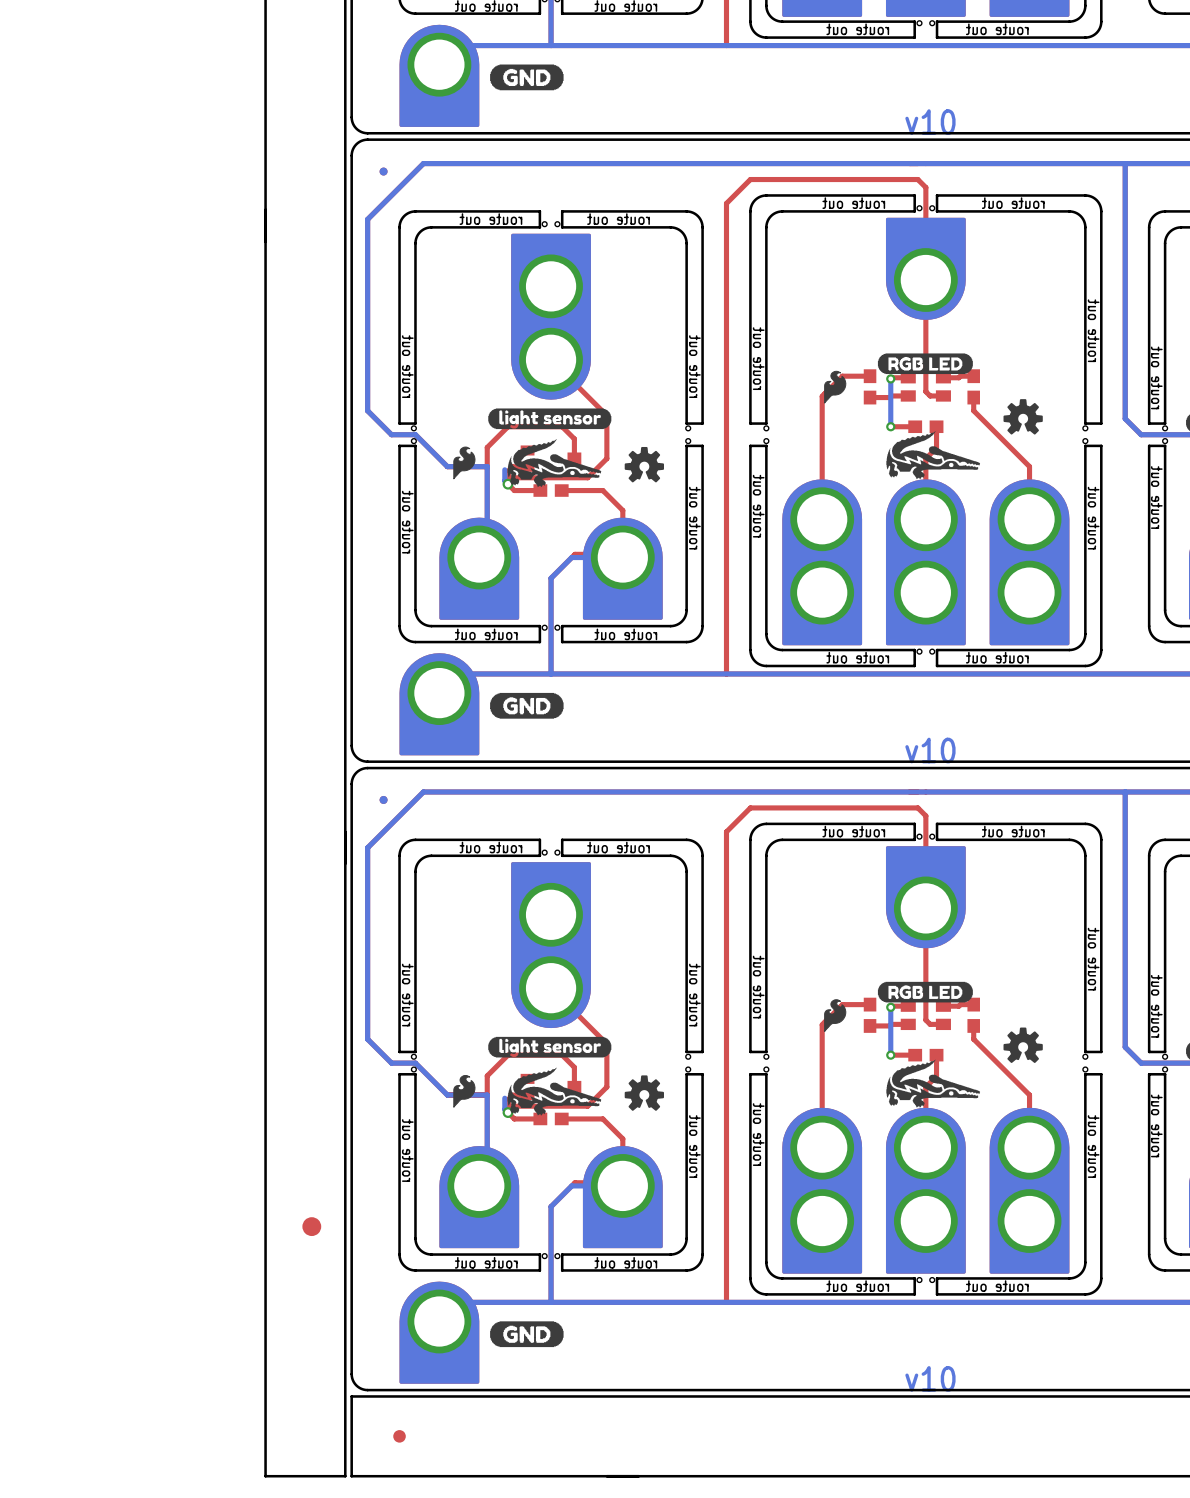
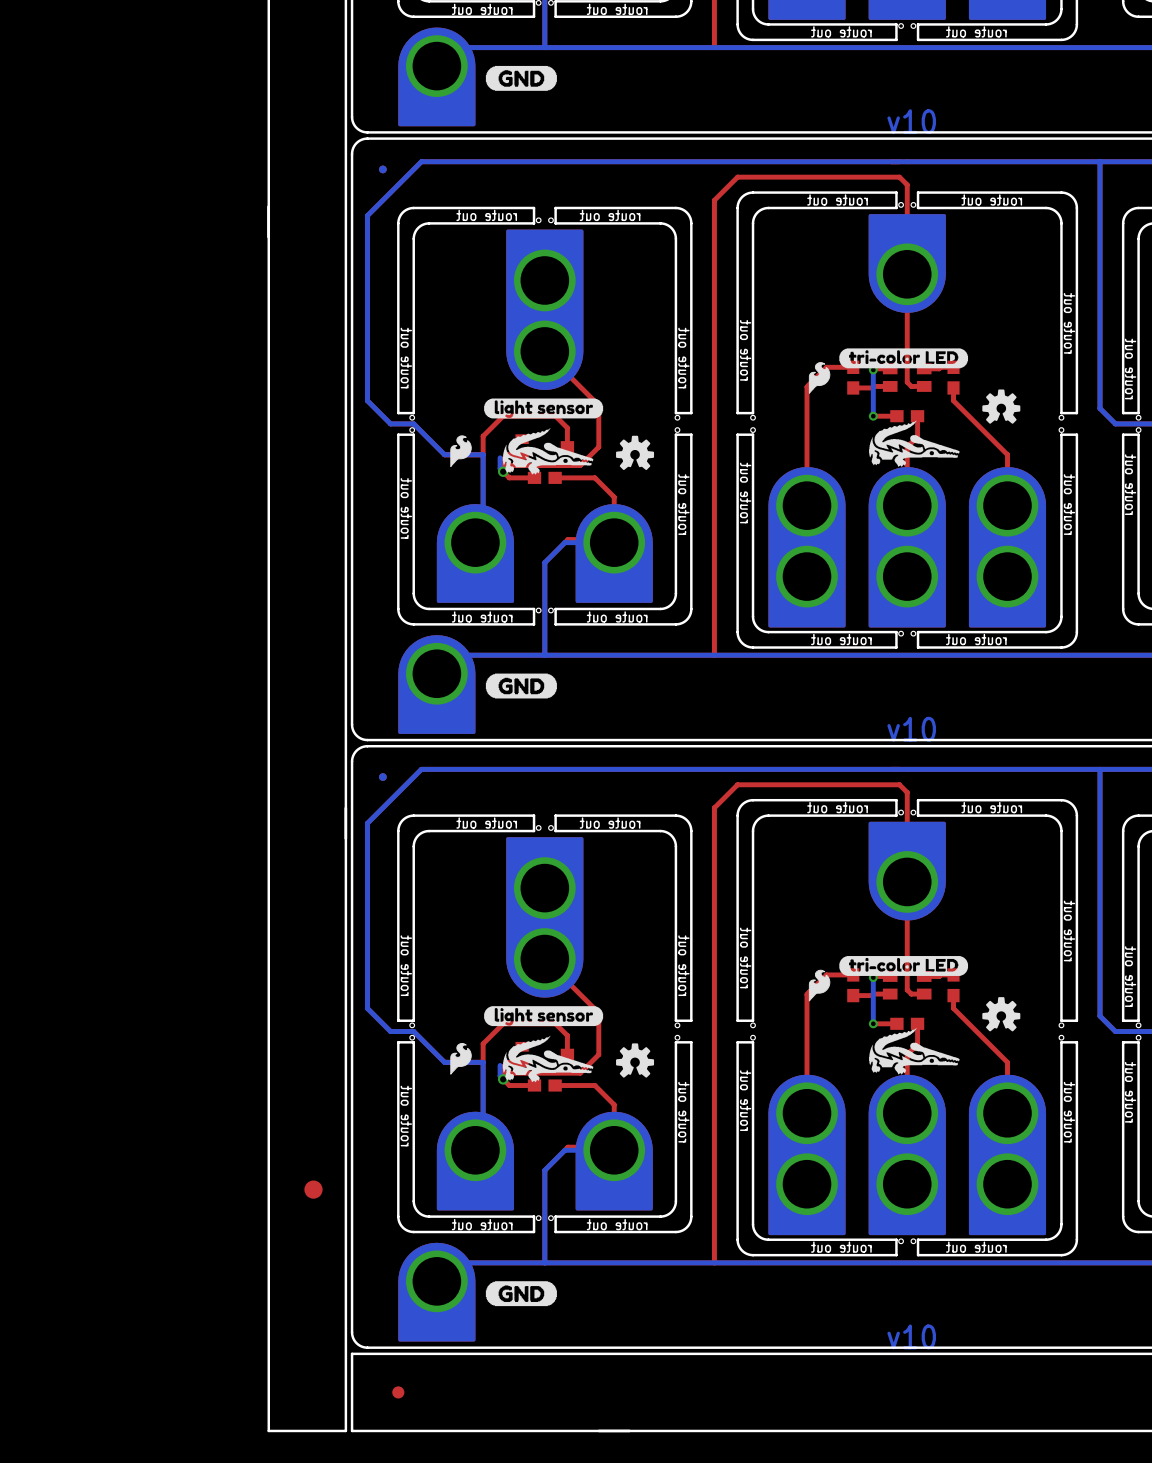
drawing shape: [877, 353, 973, 375] -> [839, 348, 969, 369]
drawing shape: [877, 981, 973, 1003] -> [839, 956, 969, 976]

